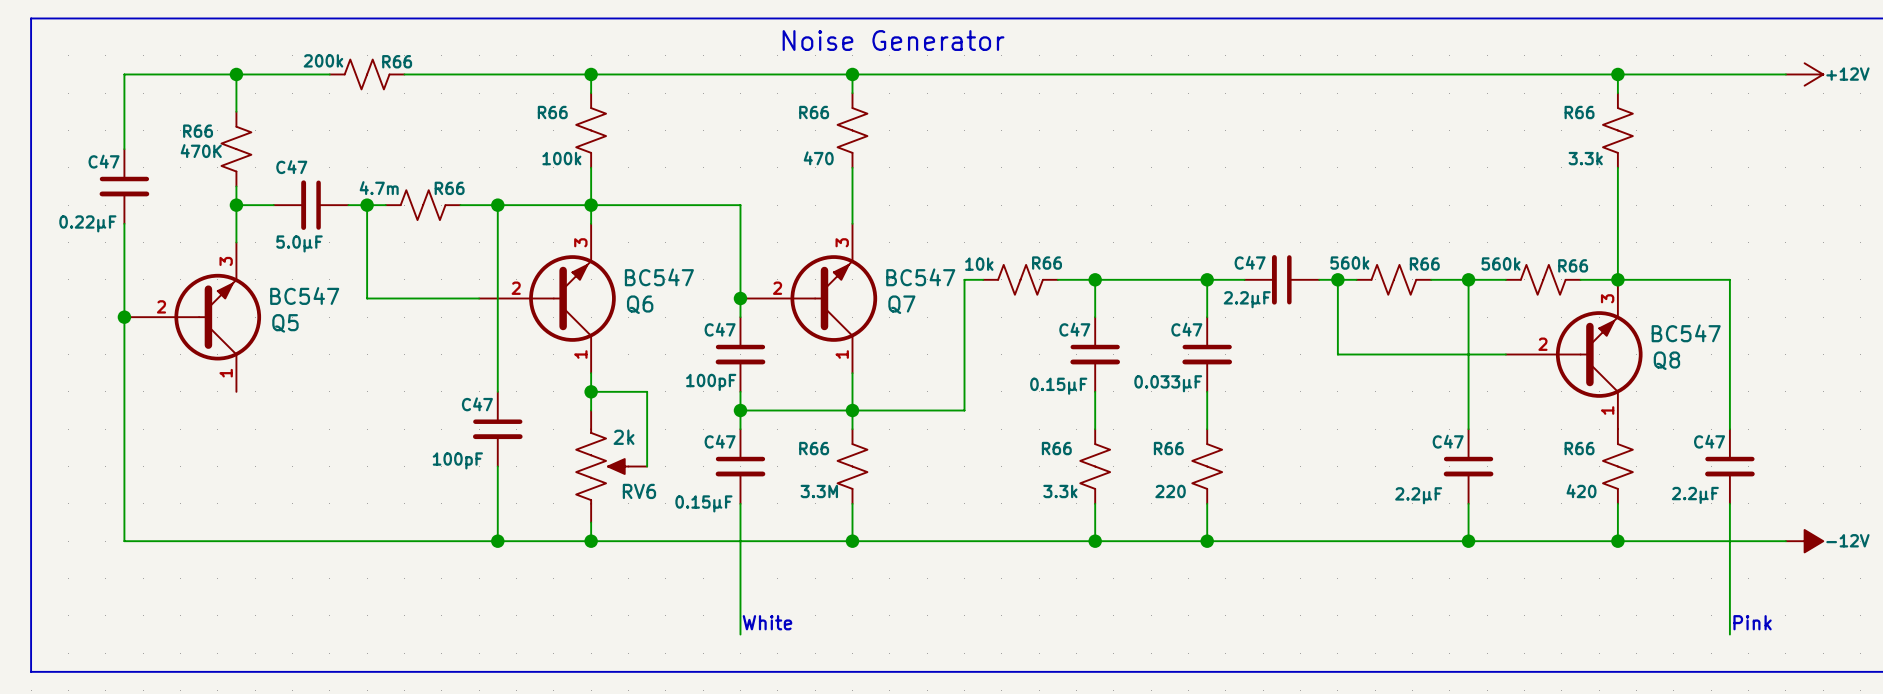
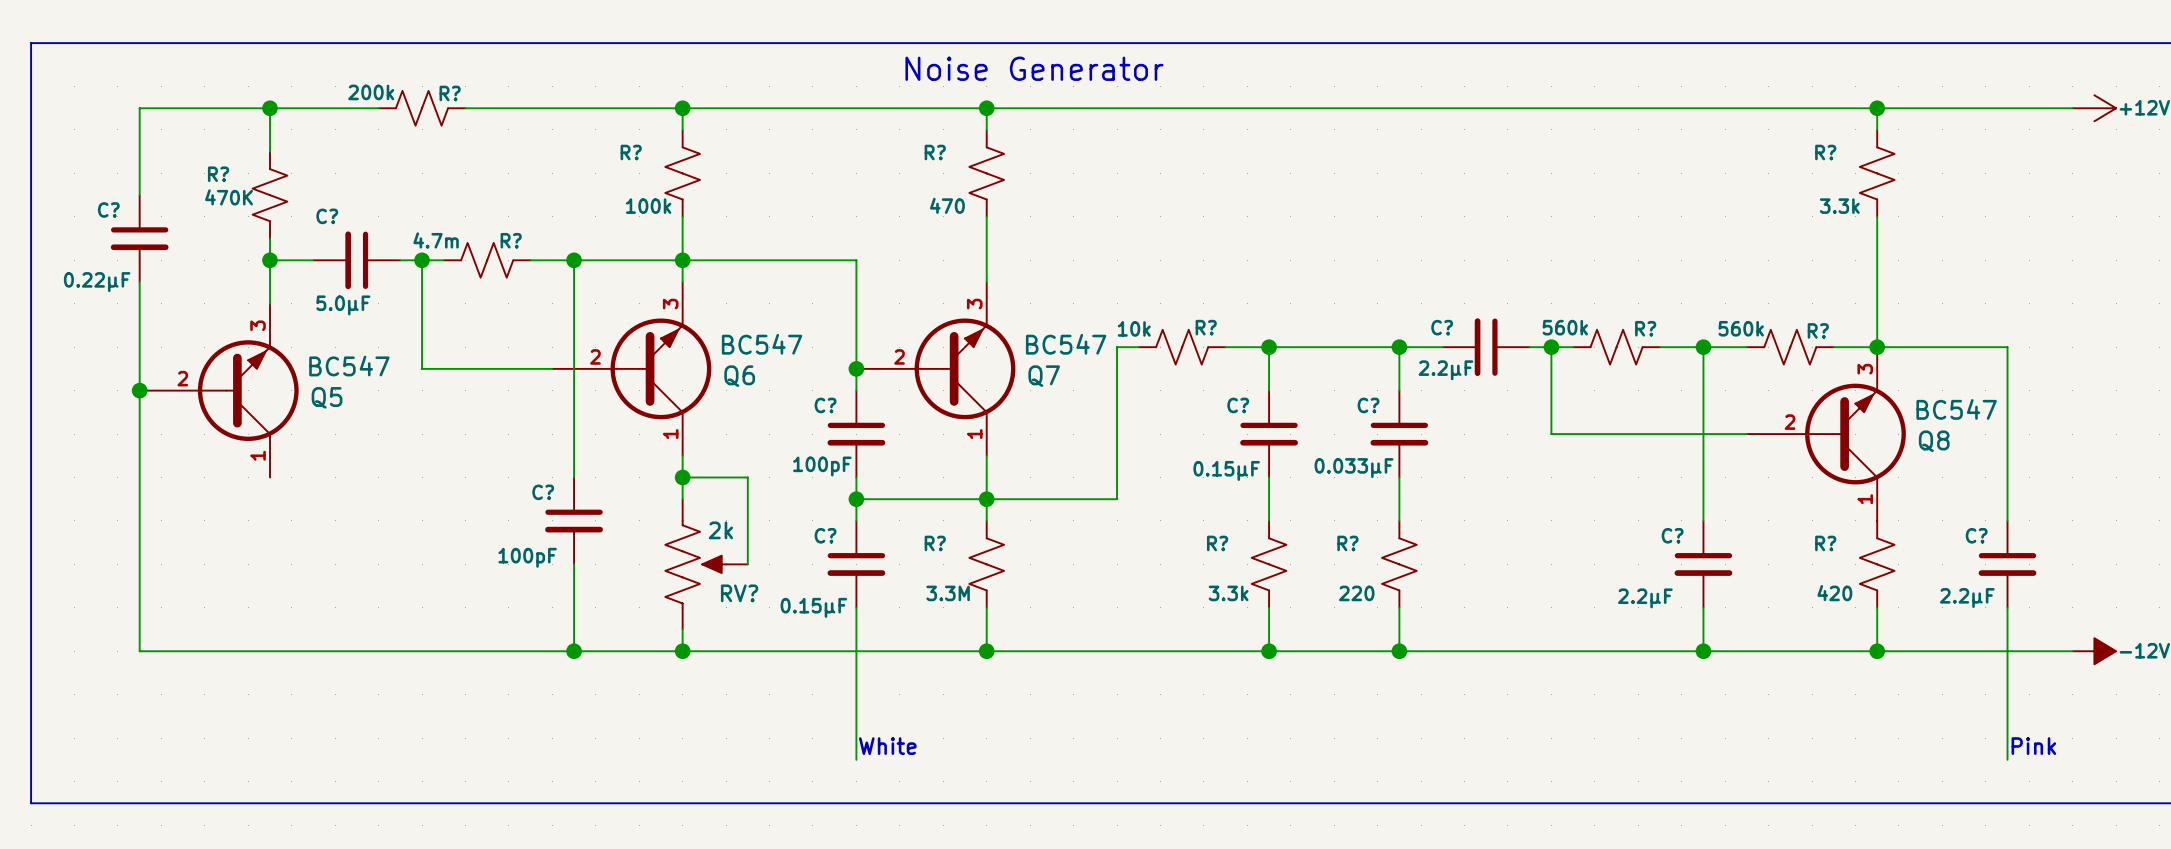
R66 name: R66 (397, 61) -> R? (450, 93)
R66 name: R66 (552, 112) -> R? (631, 152)
R66 name: R66 (814, 112) -> R? (935, 152)
R66 name: R66 (1579, 112) -> R? (1825, 152)
R66 name: R66 (198, 131) -> R? (218, 174)
C47 name: C47 (104, 161) -> C? (108, 209)
C47 name: C47 (291, 167) -> C? (327, 216)
R66 name: R66 (449, 188) -> R? (511, 240)
C47 name: C47 (1250, 262) -> C? (1442, 327)
R66 name: R66 (1047, 263) -> R? (1206, 327)
R66 name: R66 (1424, 263) -> R? (1645, 328)
R66 name: R66 (1573, 265) -> R? (1818, 330)
C47 name: C47 (720, 329) -> C? (825, 405)
C47 name: C47 (1074, 329) -> C? (1238, 405)
C47 name: C47 (1186, 329) -> C? (1368, 405)
C47 name: C47 (477, 404) -> C? (543, 492)
C47 name: C47 (720, 441) -> C? (825, 535)
C47 name: C47 (1448, 441) -> C? (1672, 535)
C47 name: C47 (1709, 441) -> C? (1976, 535)
R66 name: R66 (814, 448) -> R? (935, 543)
R66 name: R66 (1056, 448) -> R? (1217, 543)
R66 name: R66 (1168, 448) -> R? (1347, 543)
R66 name: R66 (1579, 448) -> R? (1825, 543)
RV6 name: RV6 (639, 491) -> RV? (739, 593)

